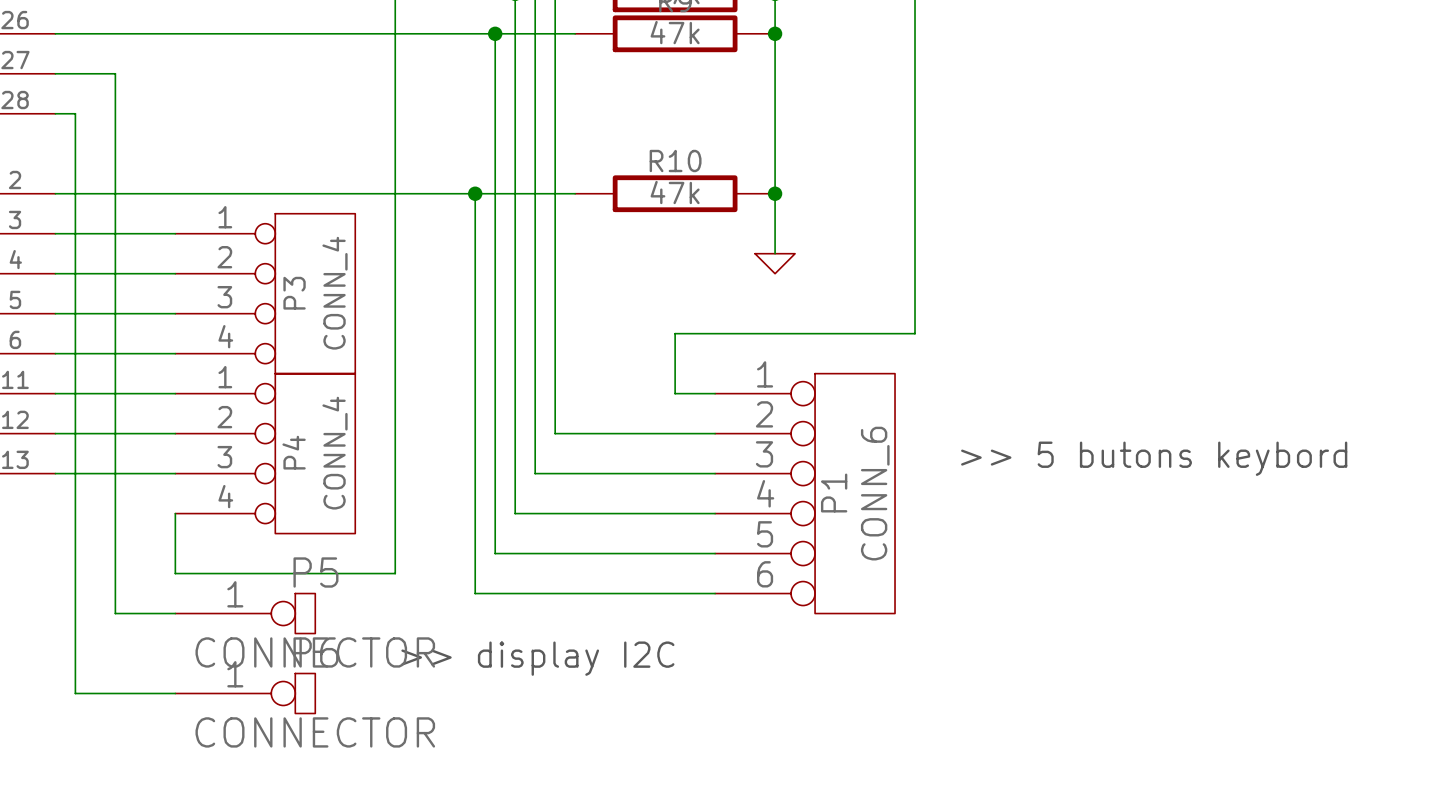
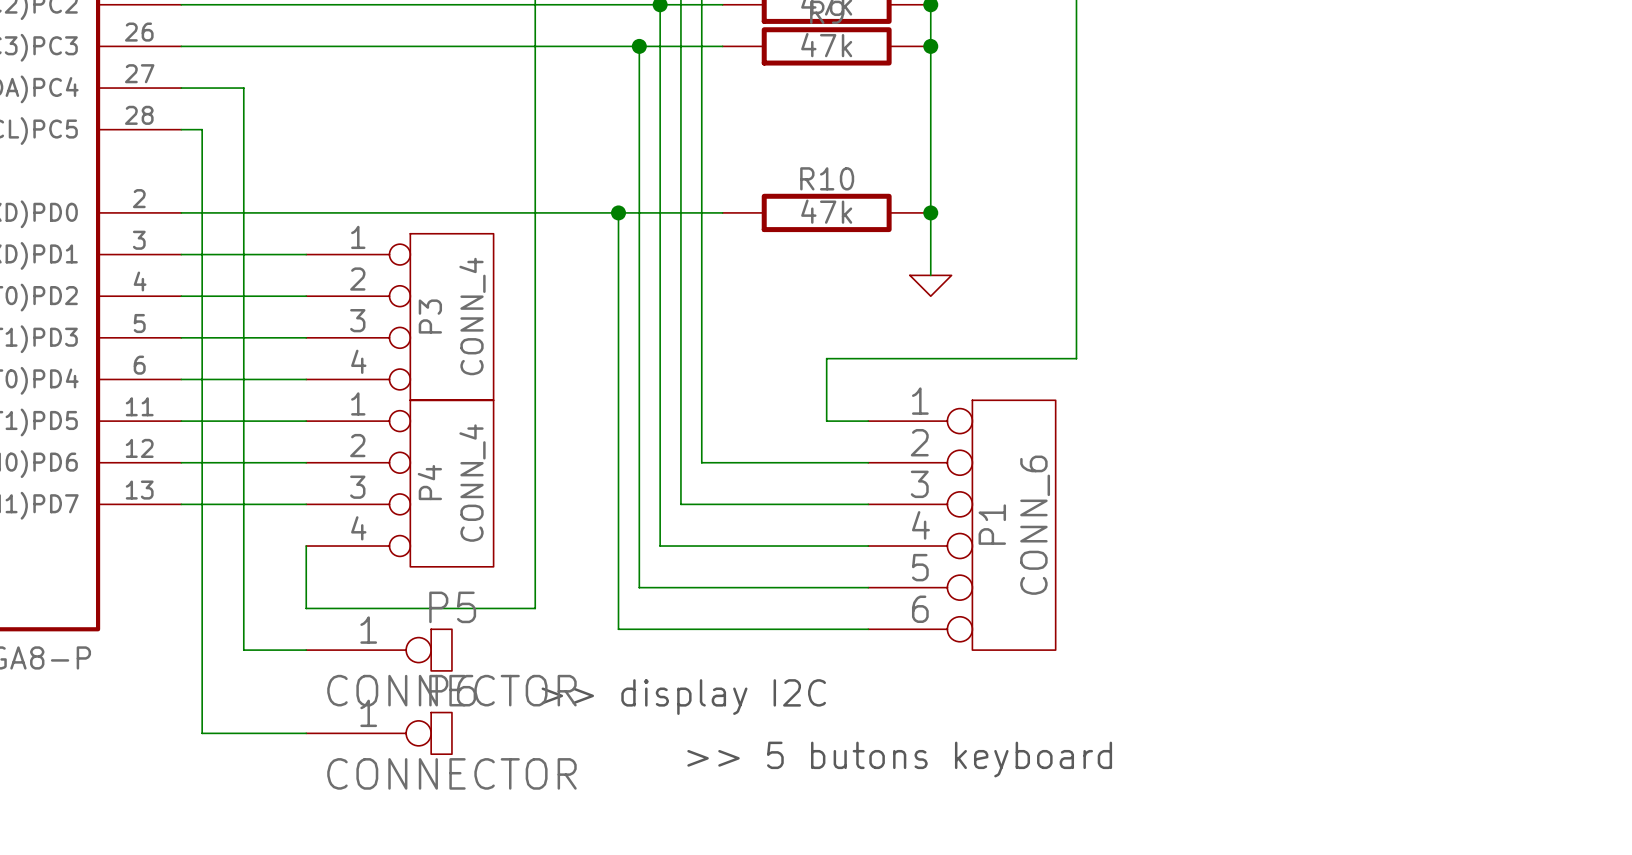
text: >> 5 butons keybord (1154, 458) -> none
text: none -> >> 5 butons keyboard (899, 759)

